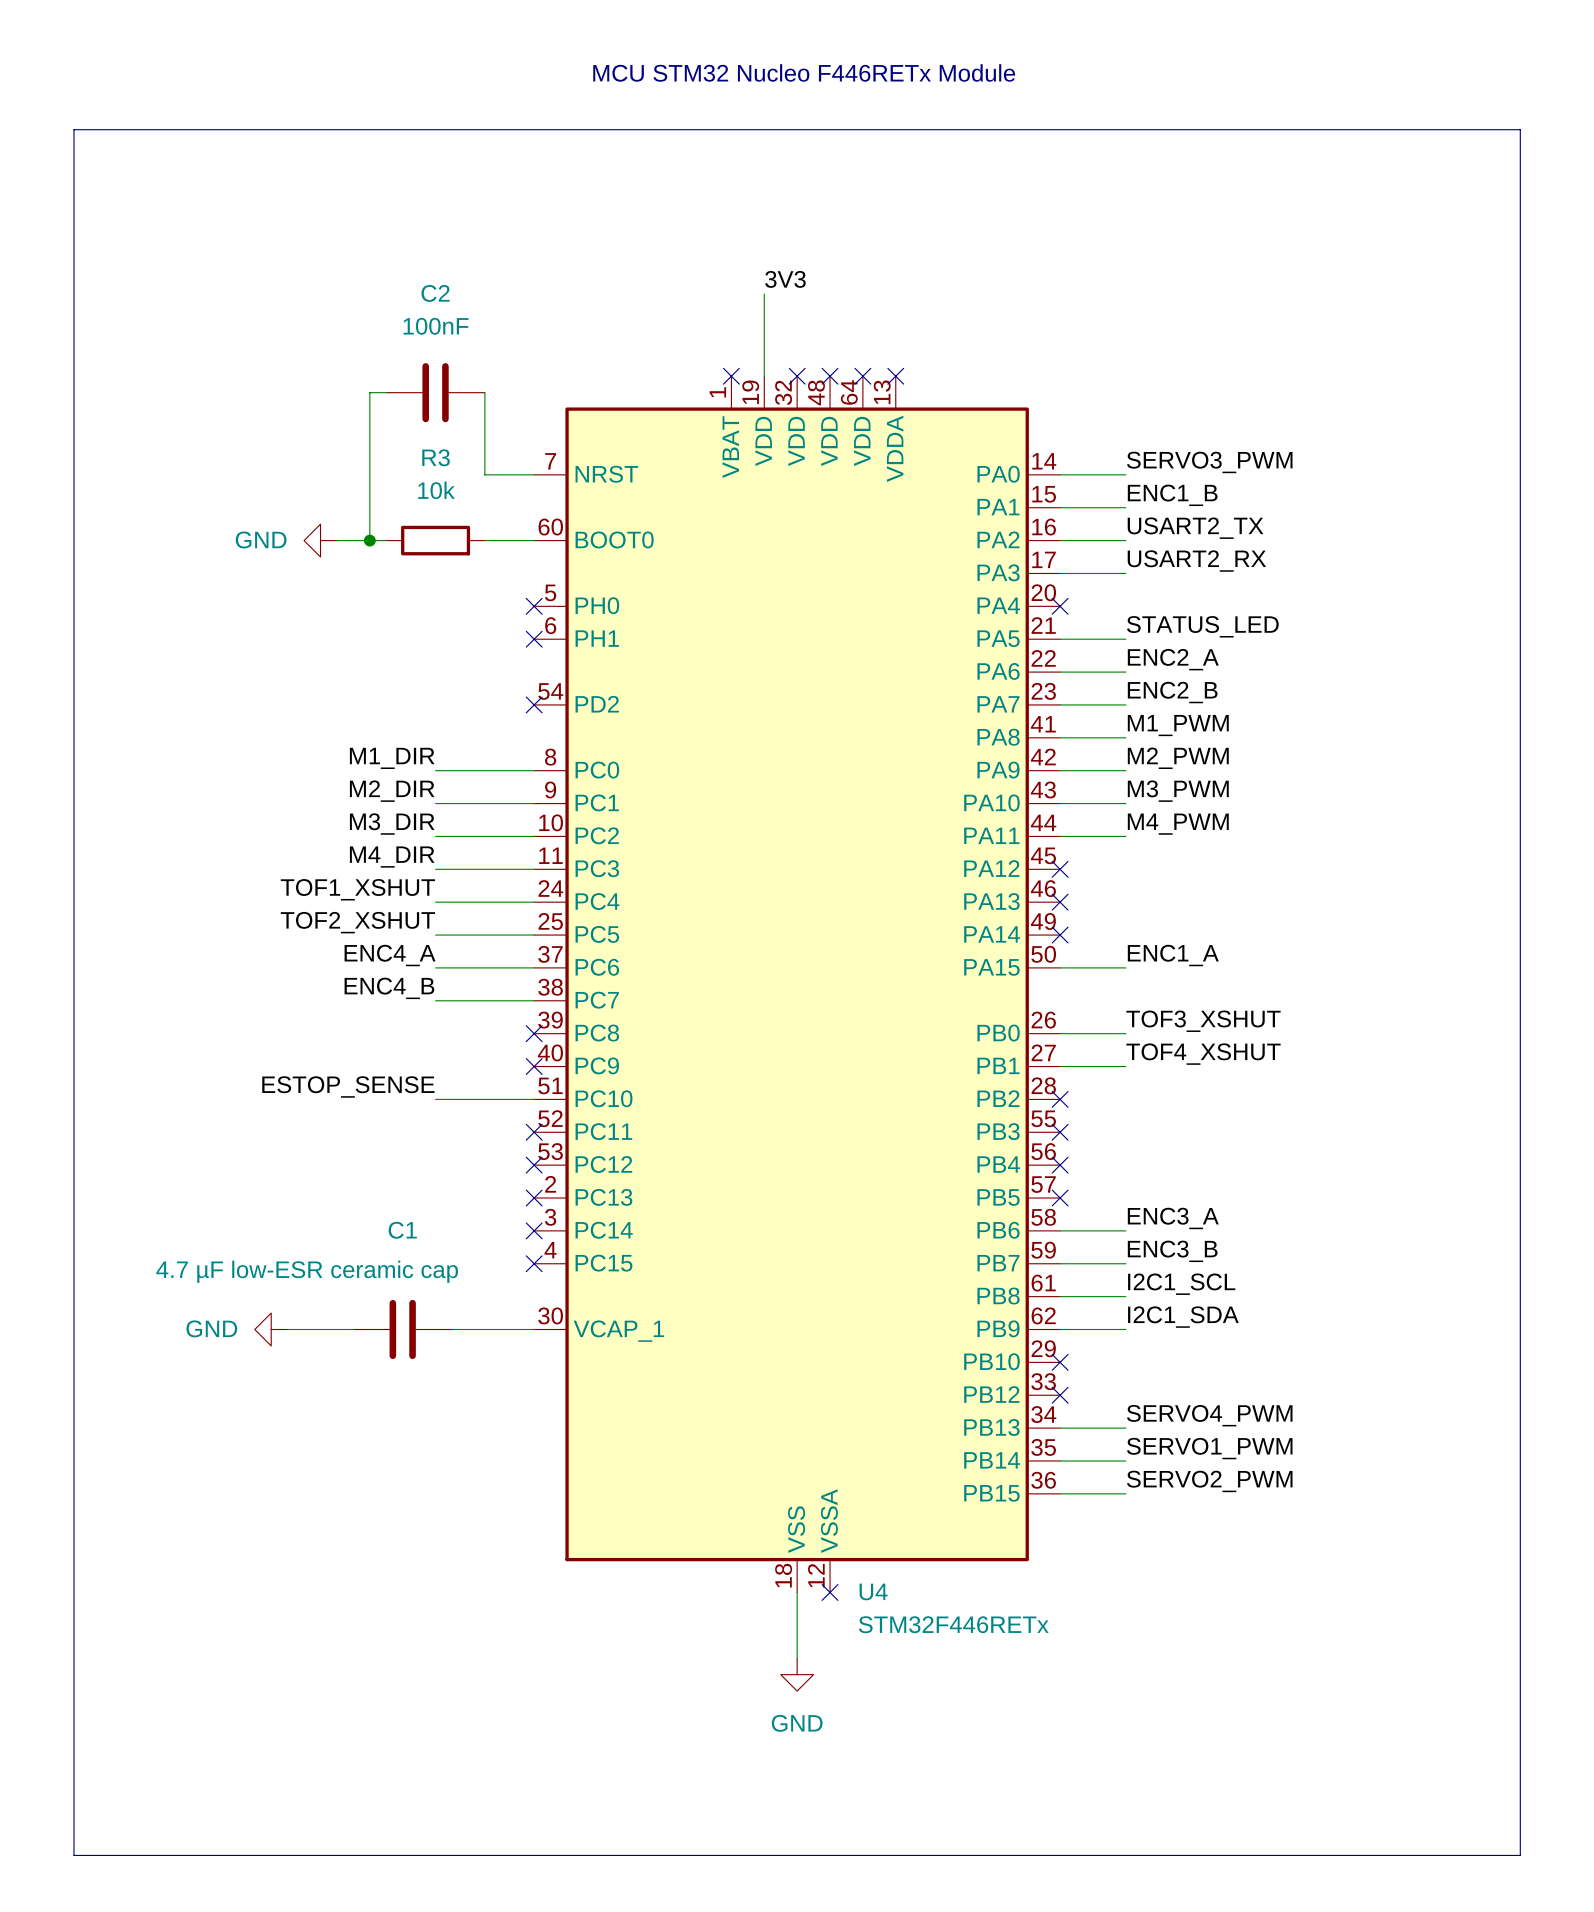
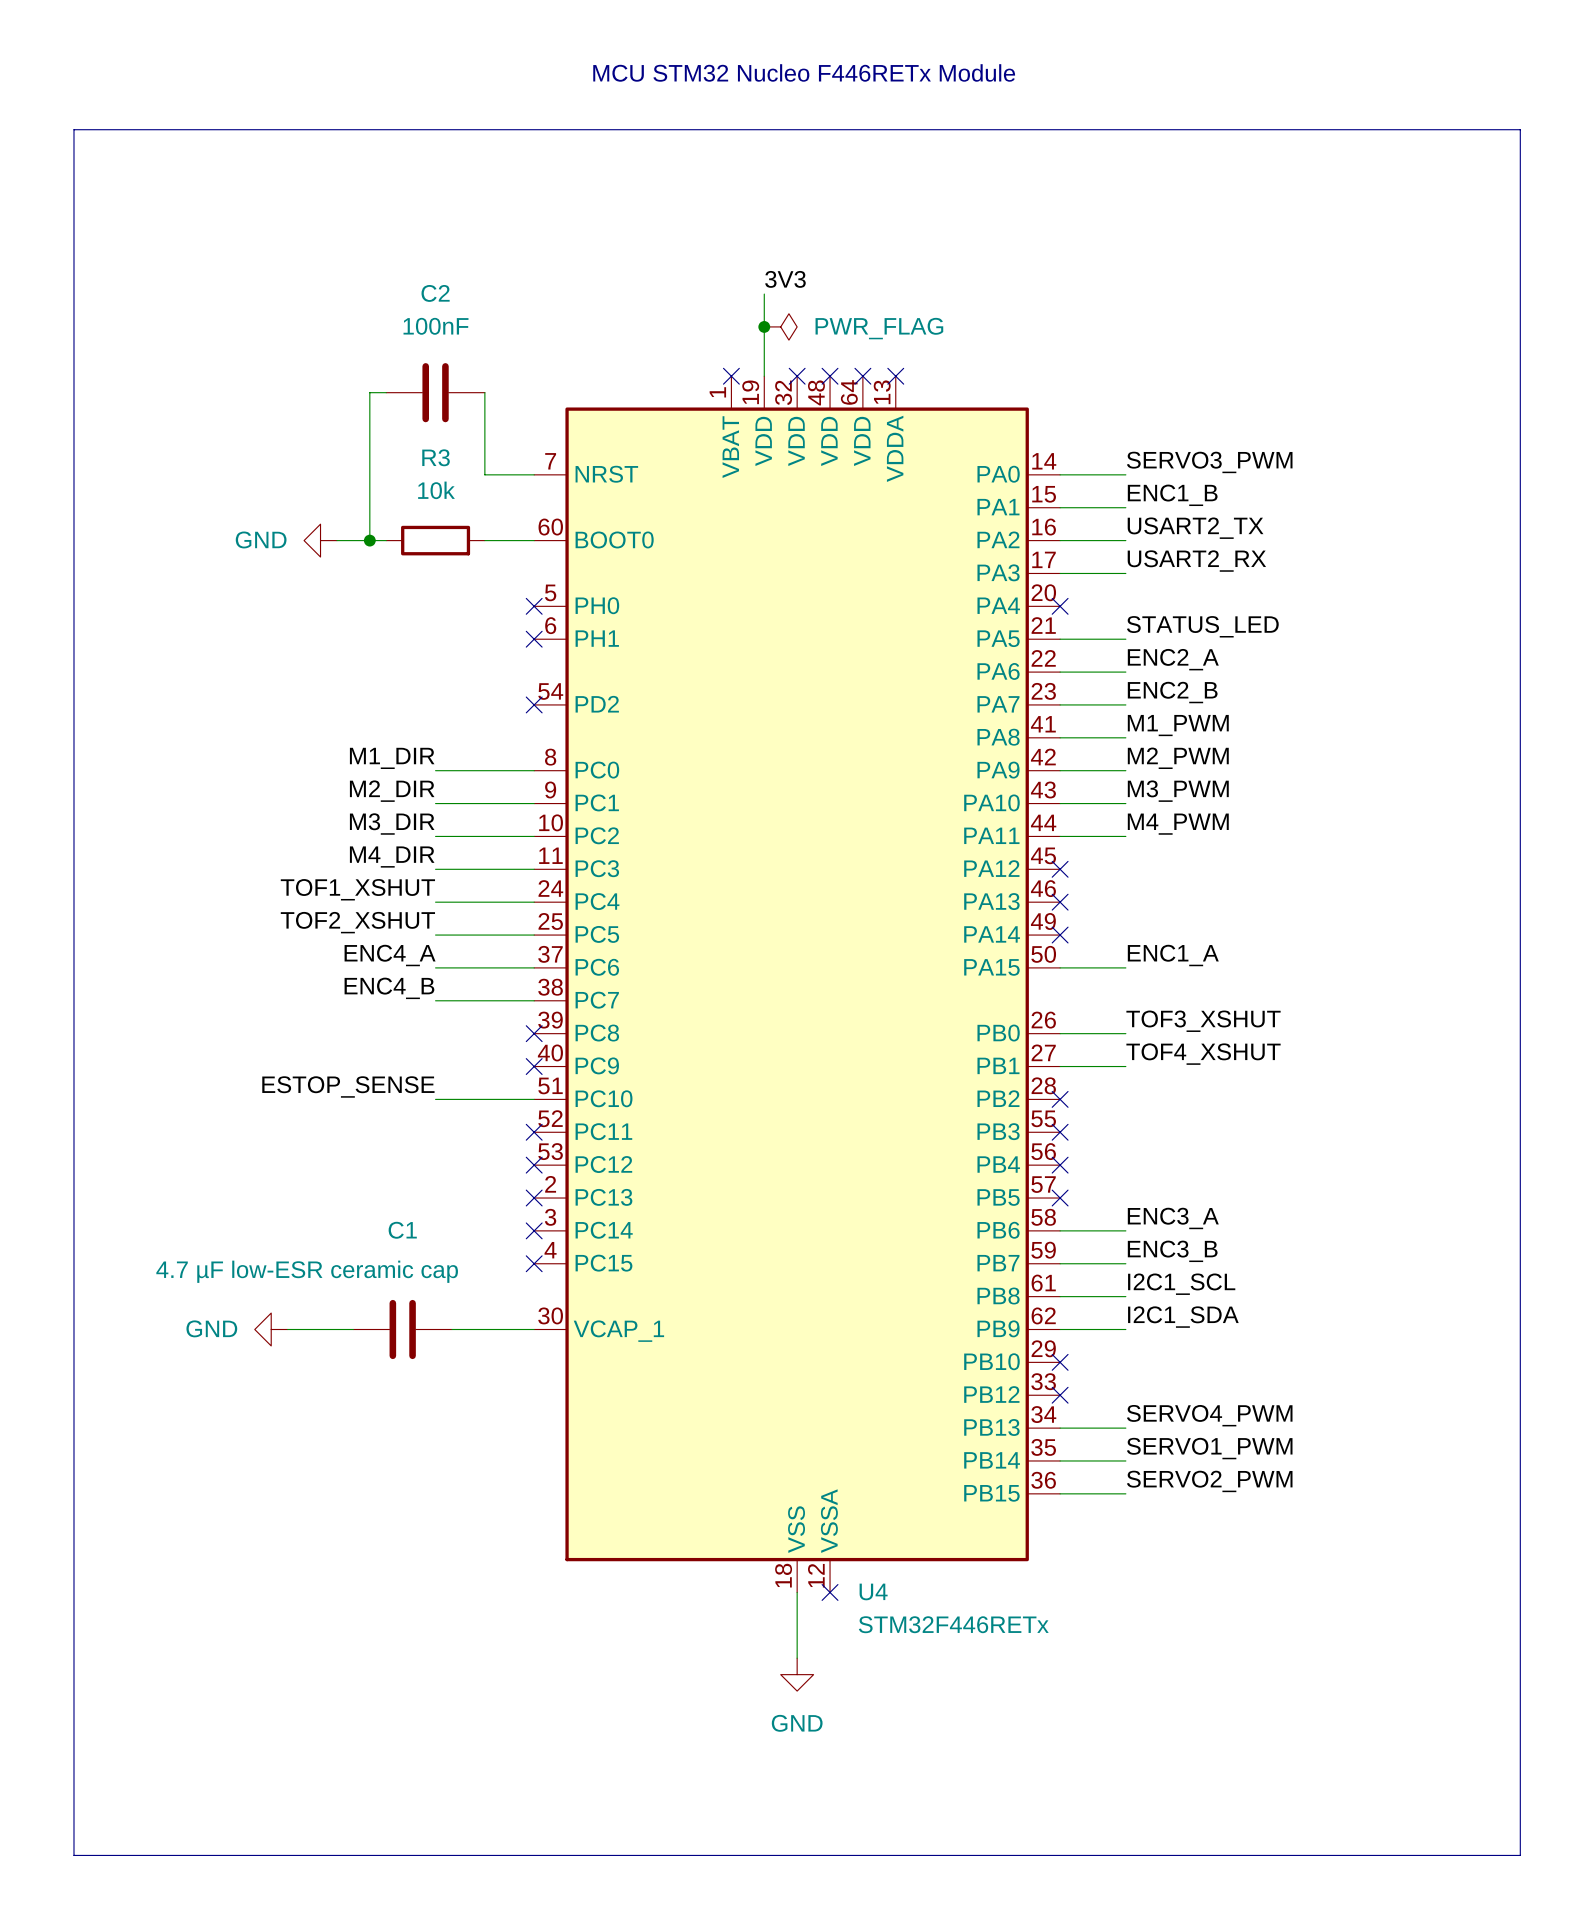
junction: none -> (764, 326)
power symbol: none -> PWR_FLAG (780, 326)

